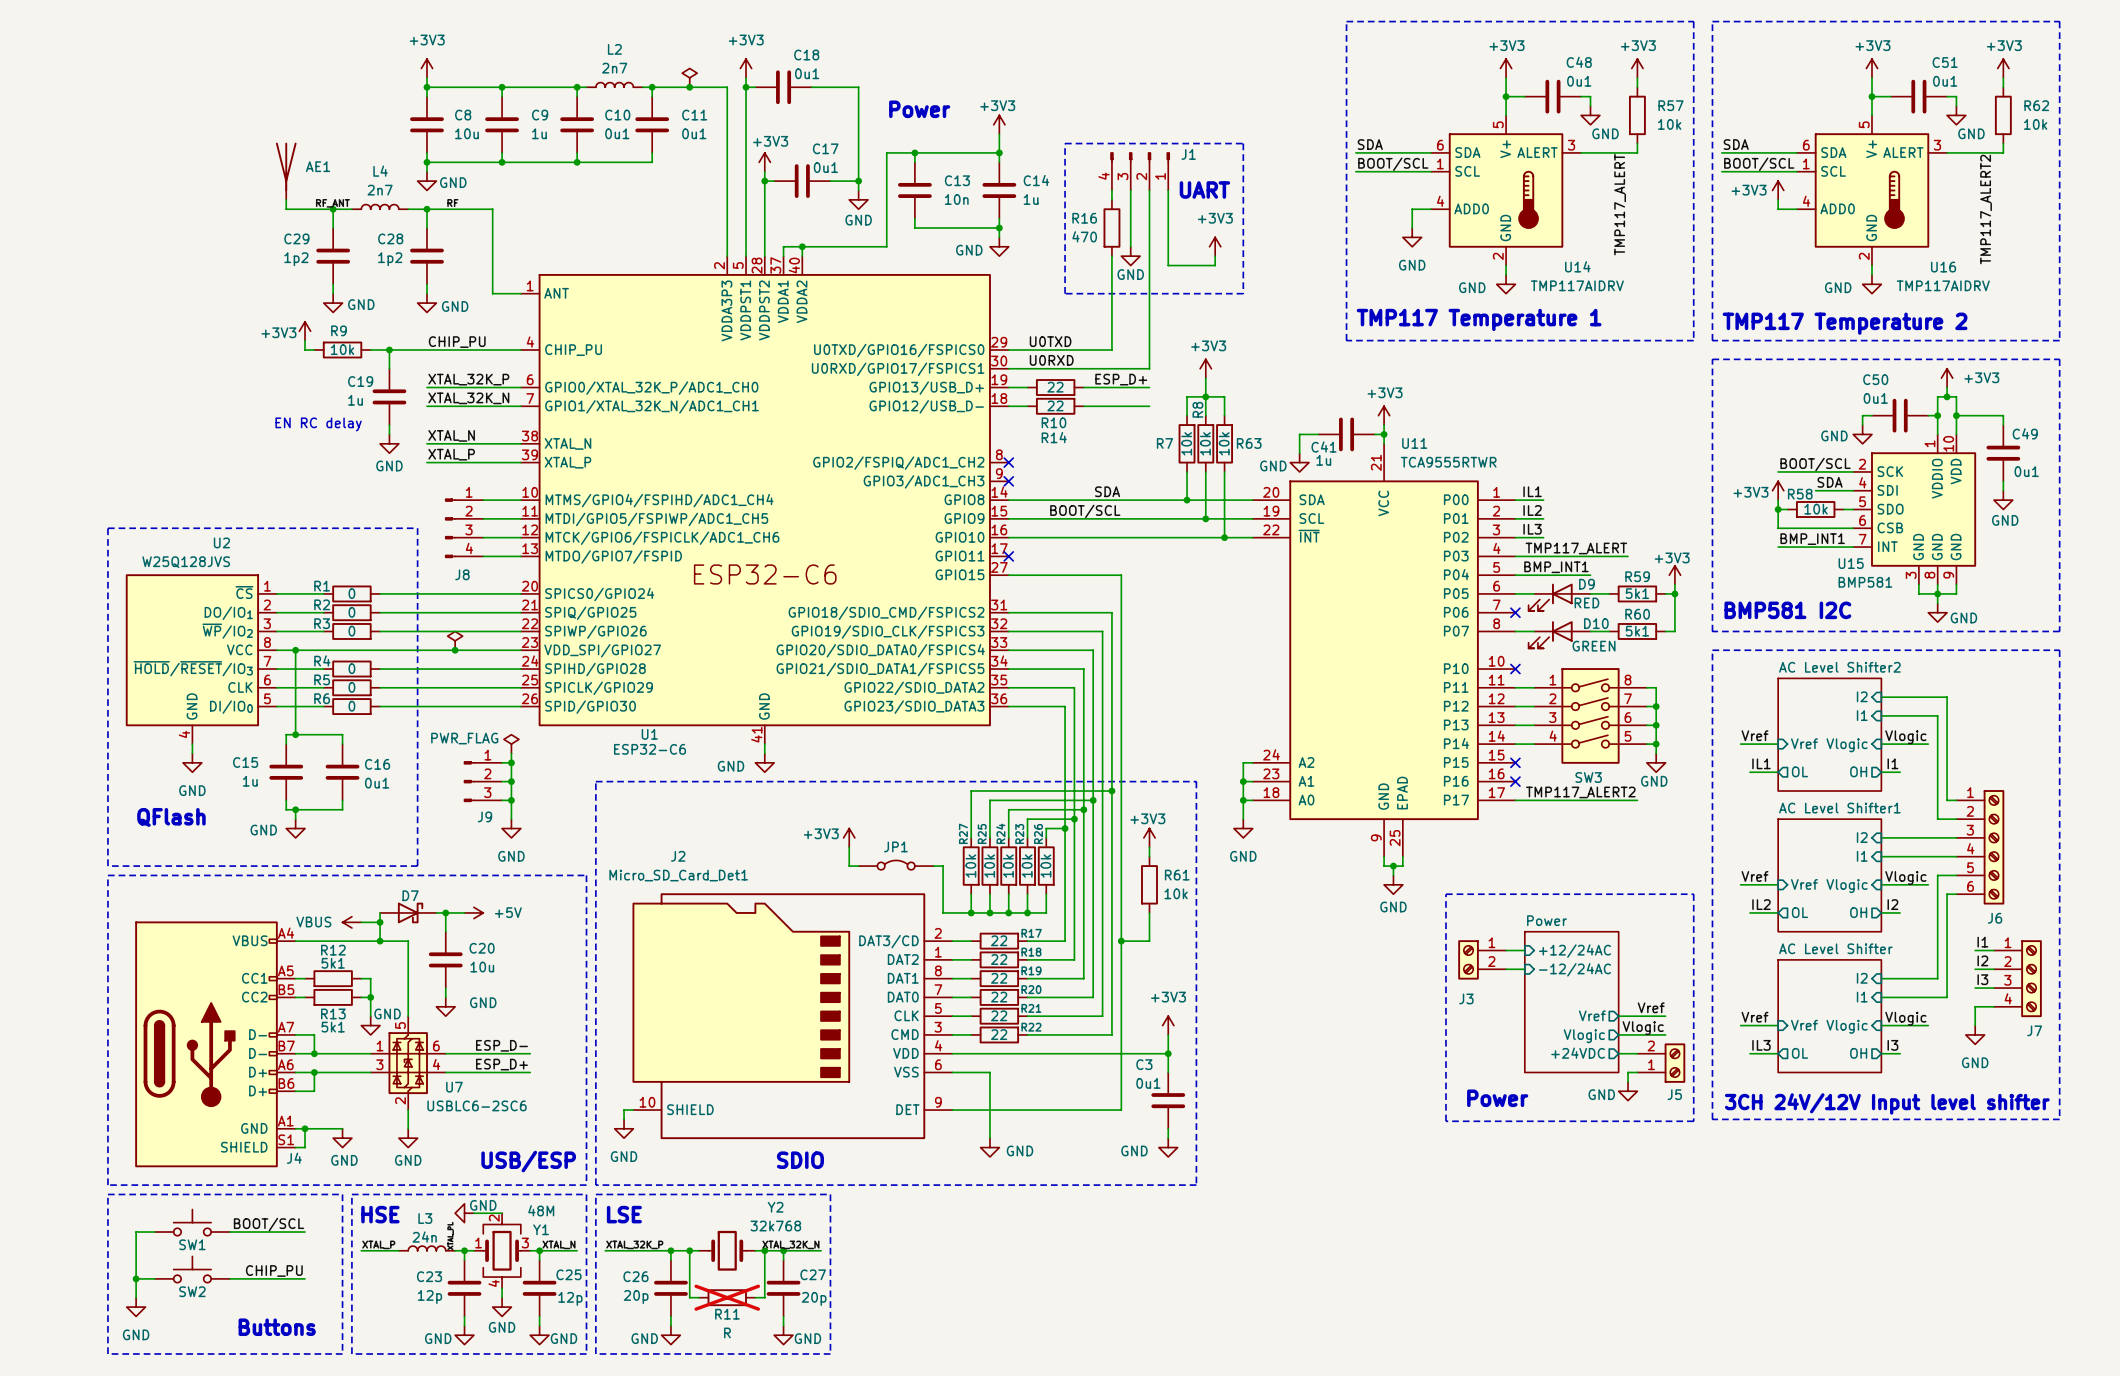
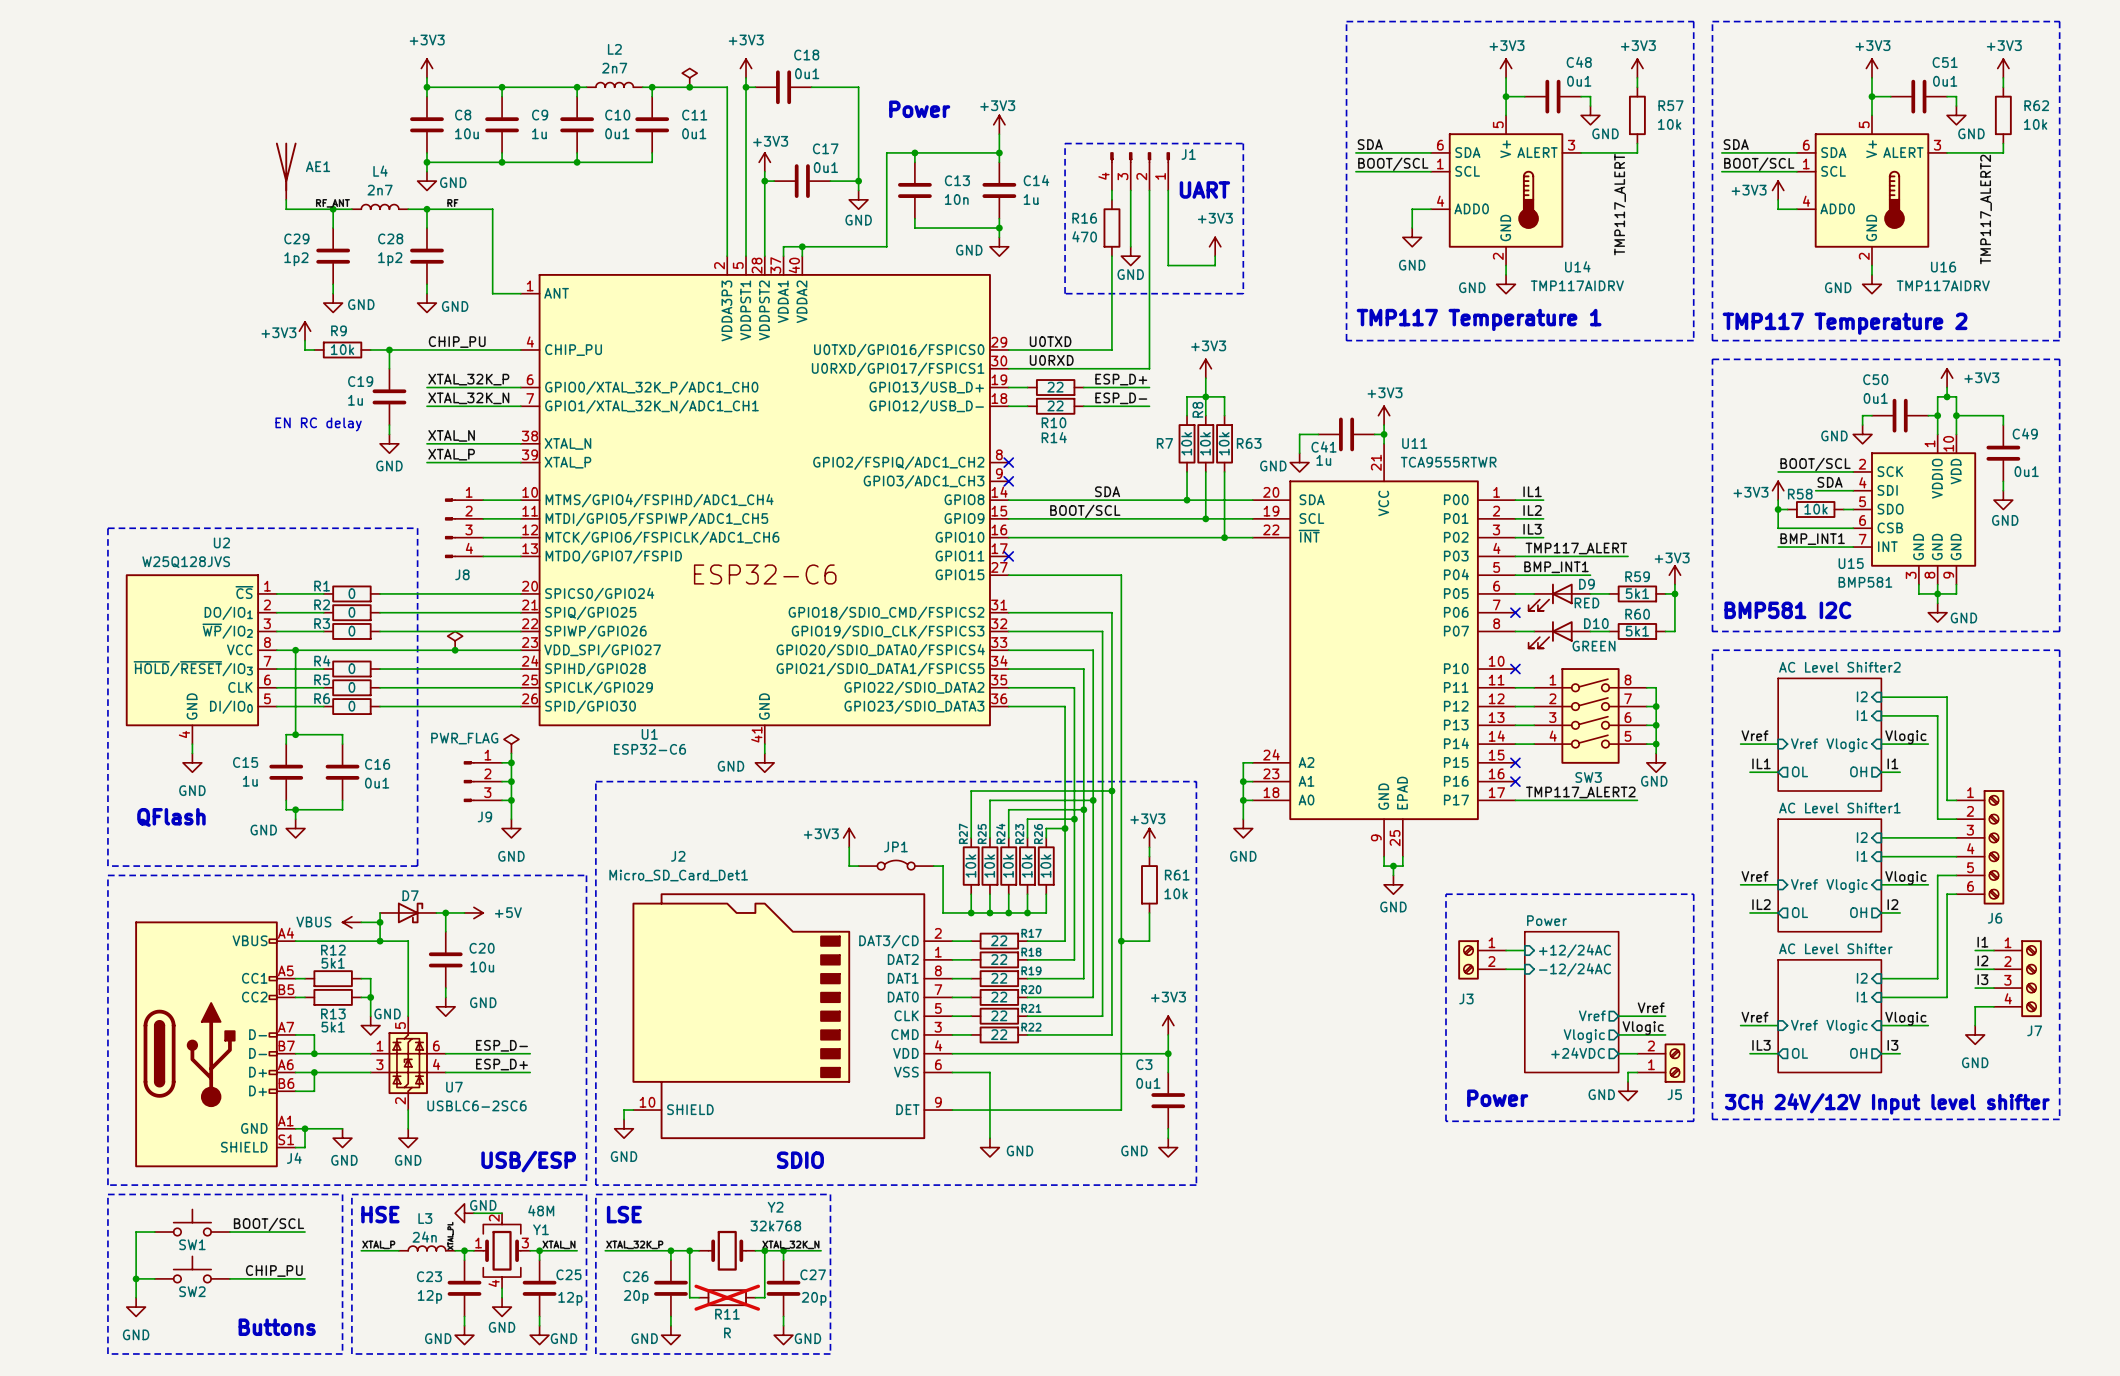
label: none -> ESP_D- (1121, 398)

